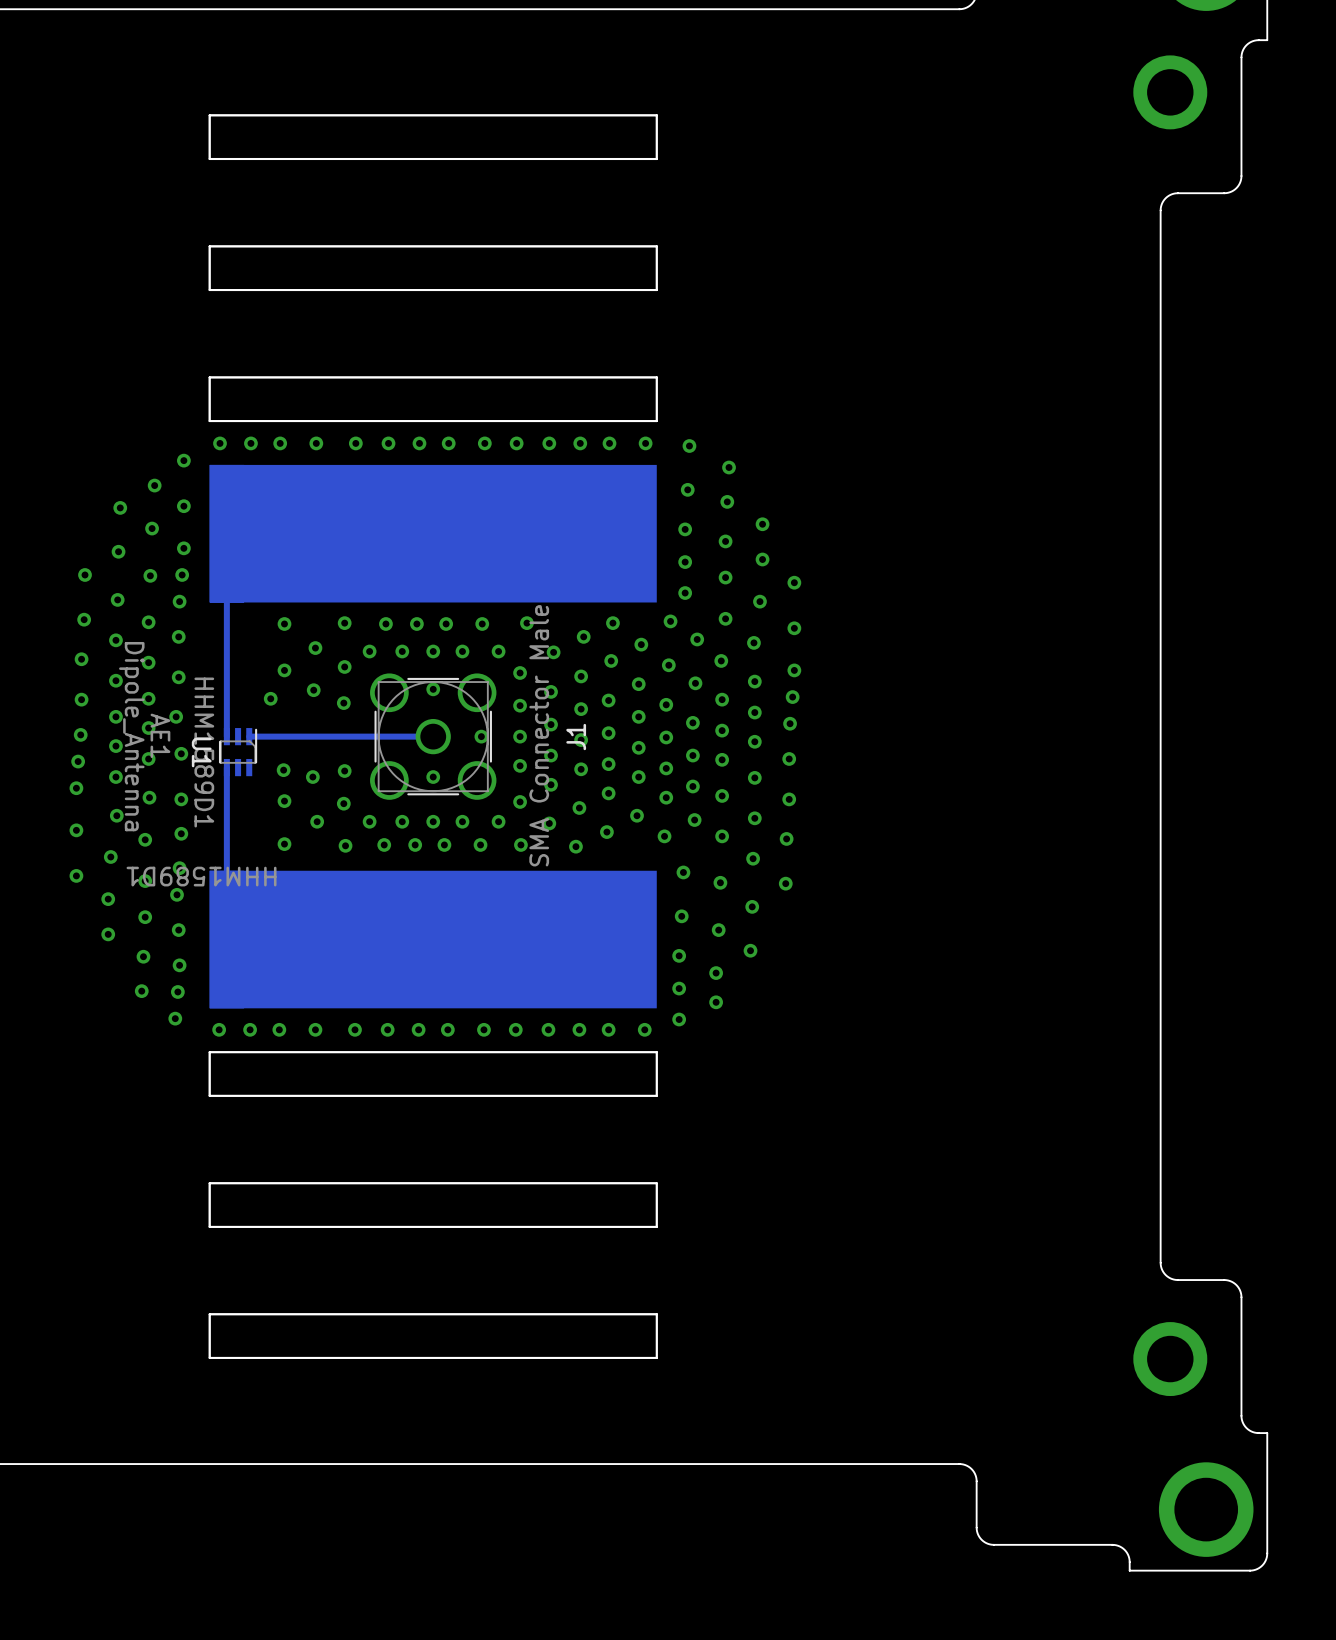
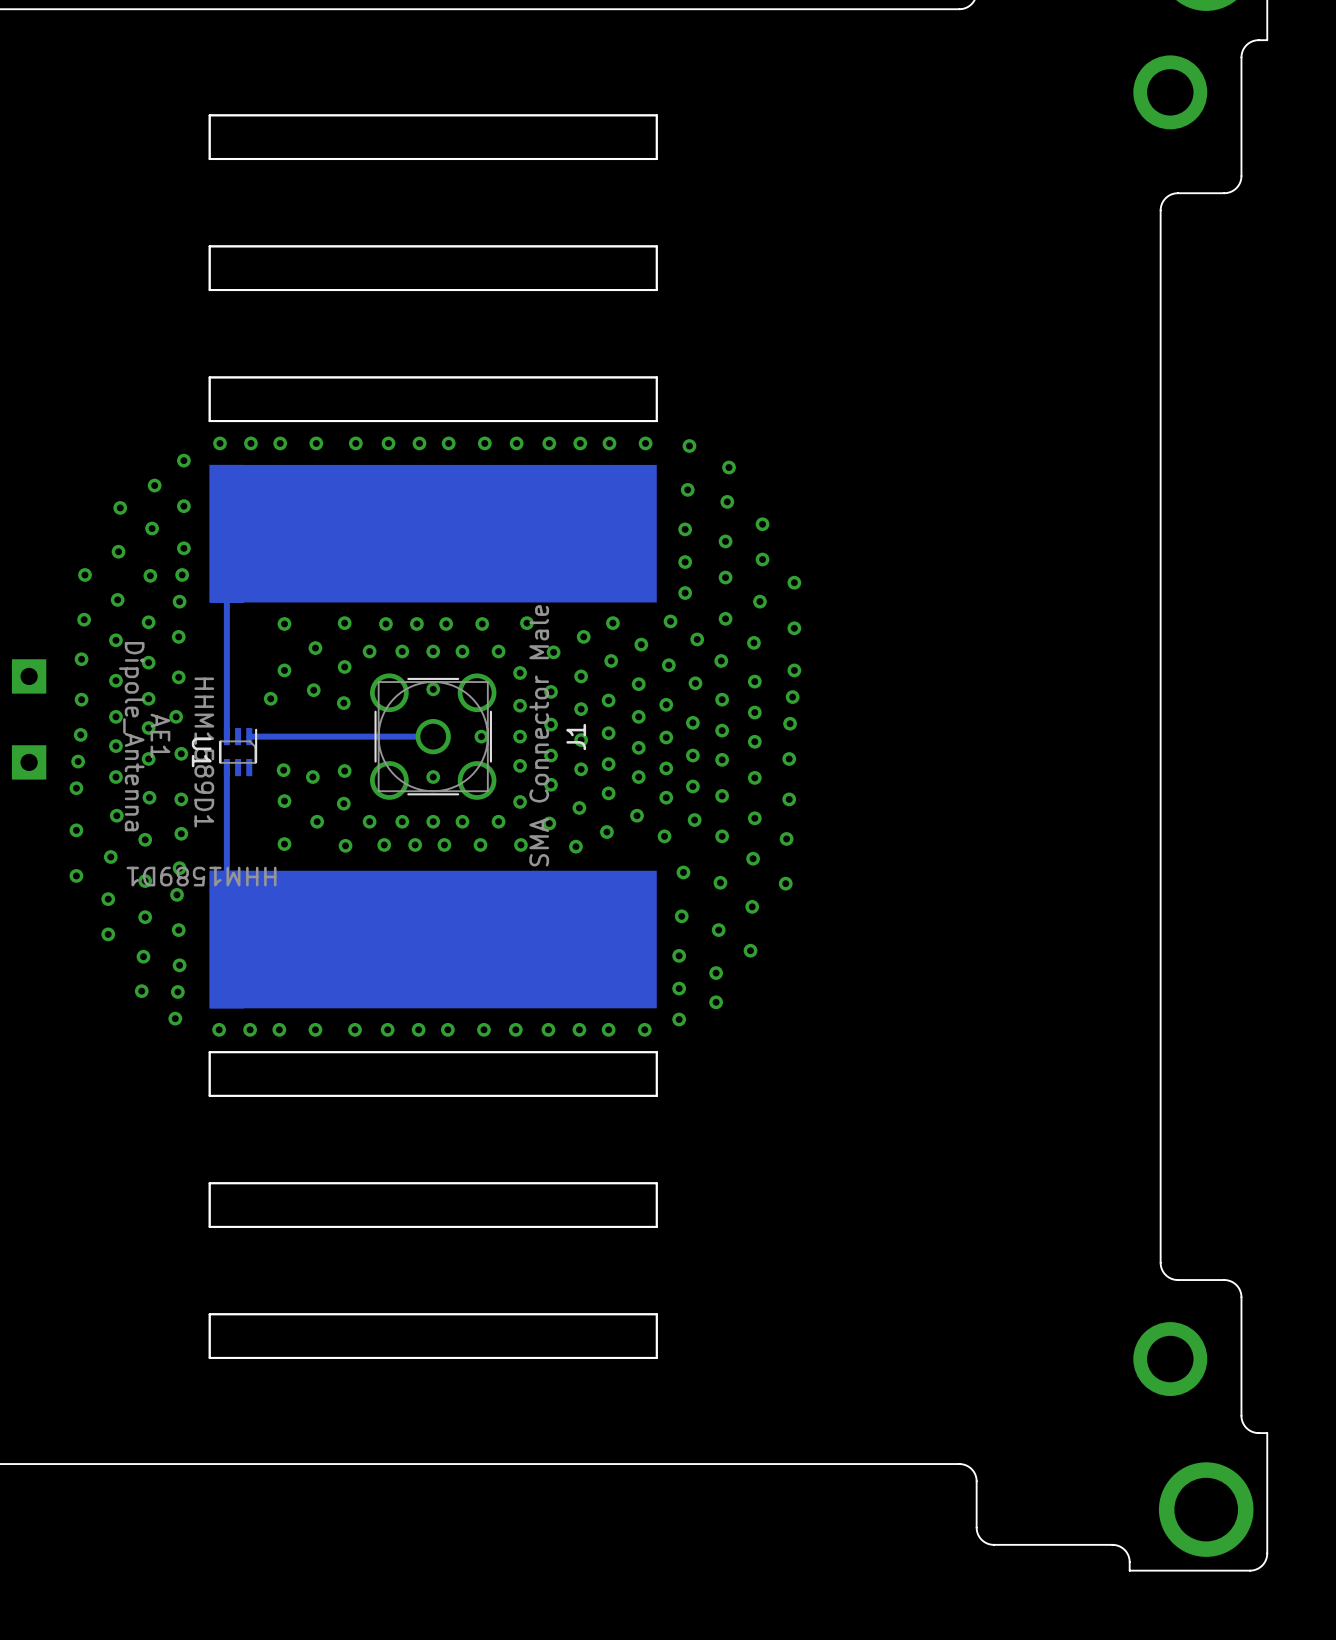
part: none -> (29, 676)
part: none -> (29, 762)

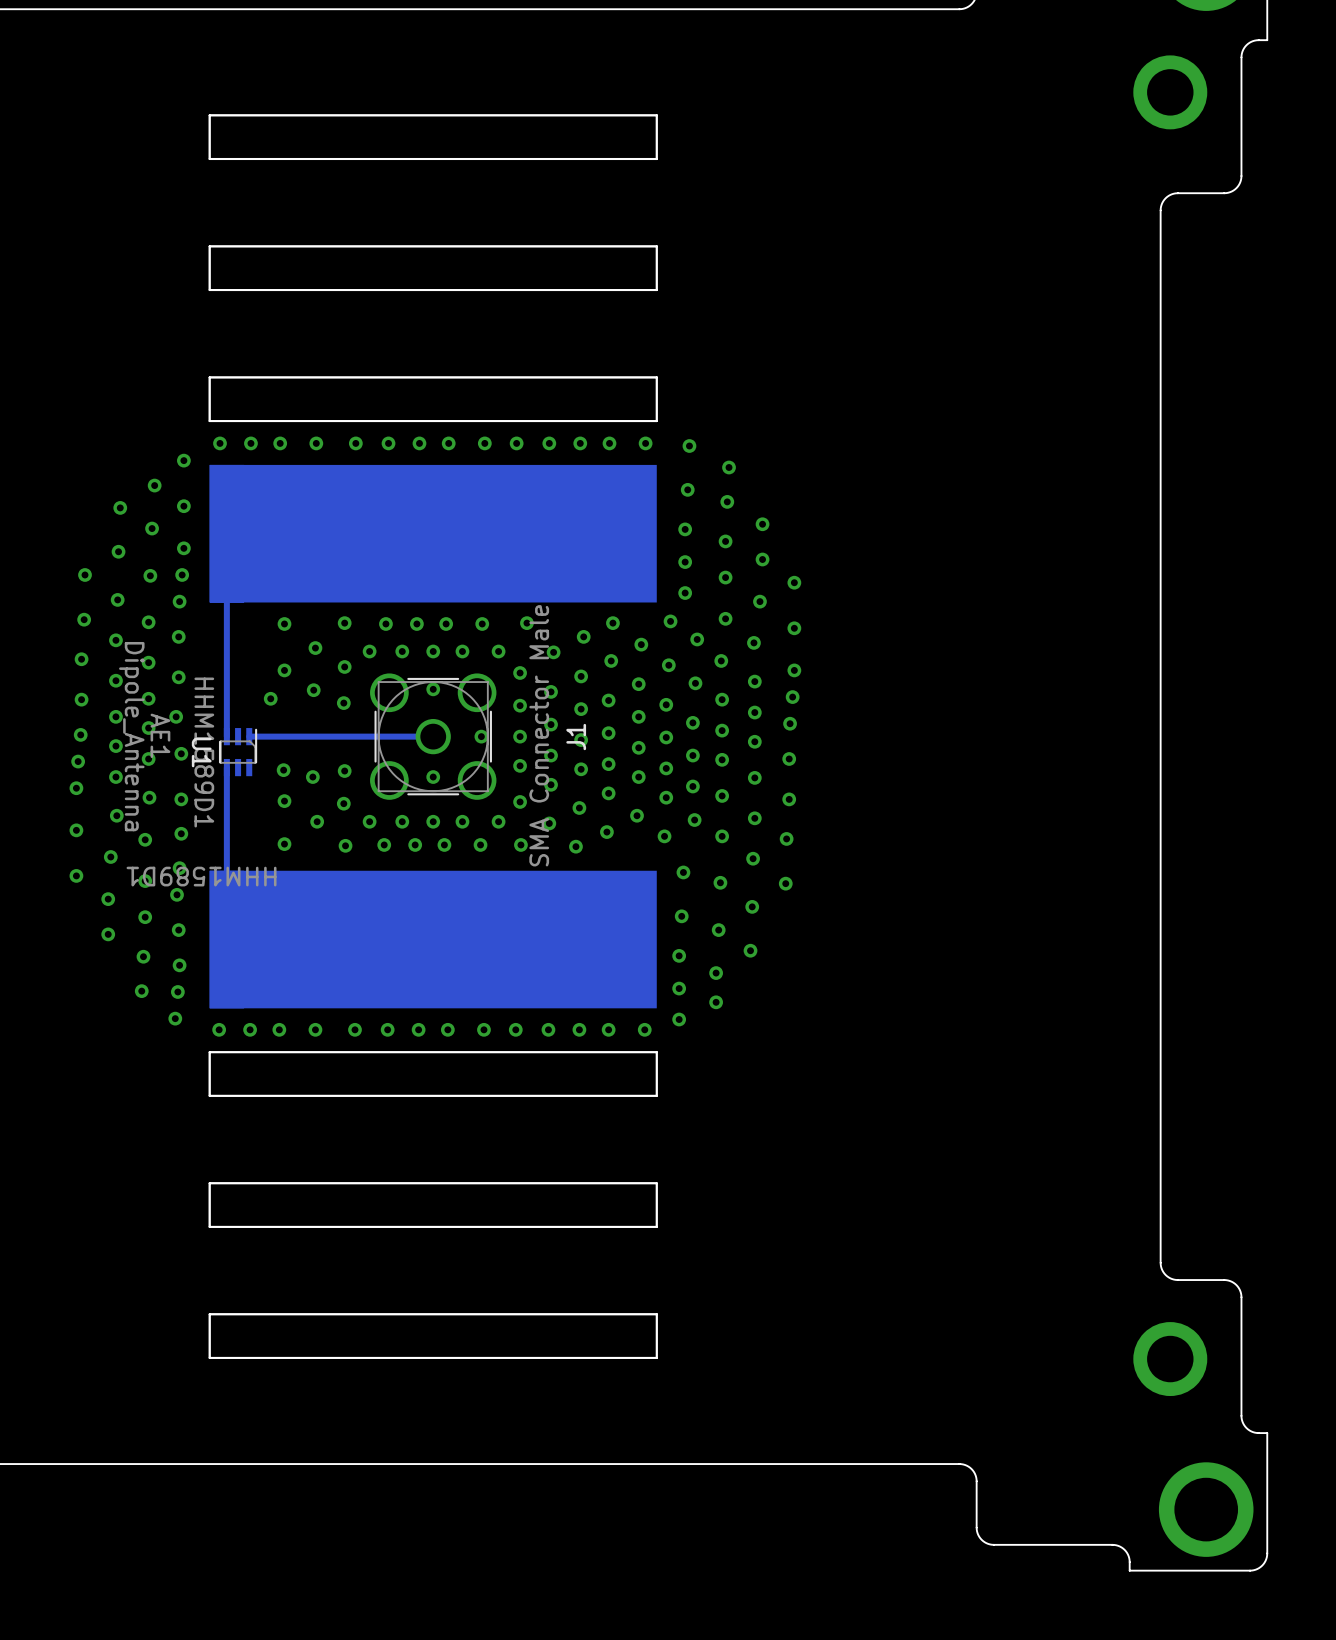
part: (29, 676) -> none
part: (29, 762) -> none

